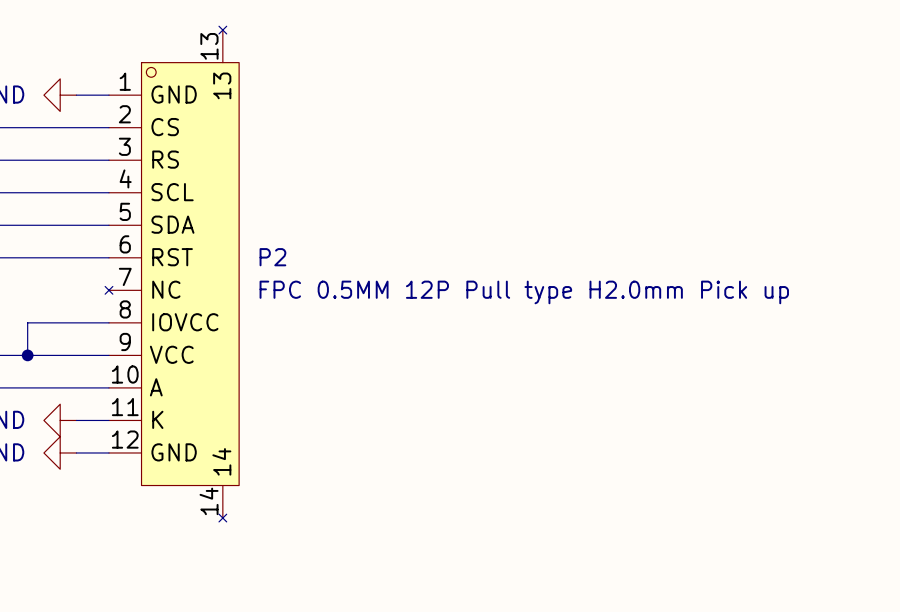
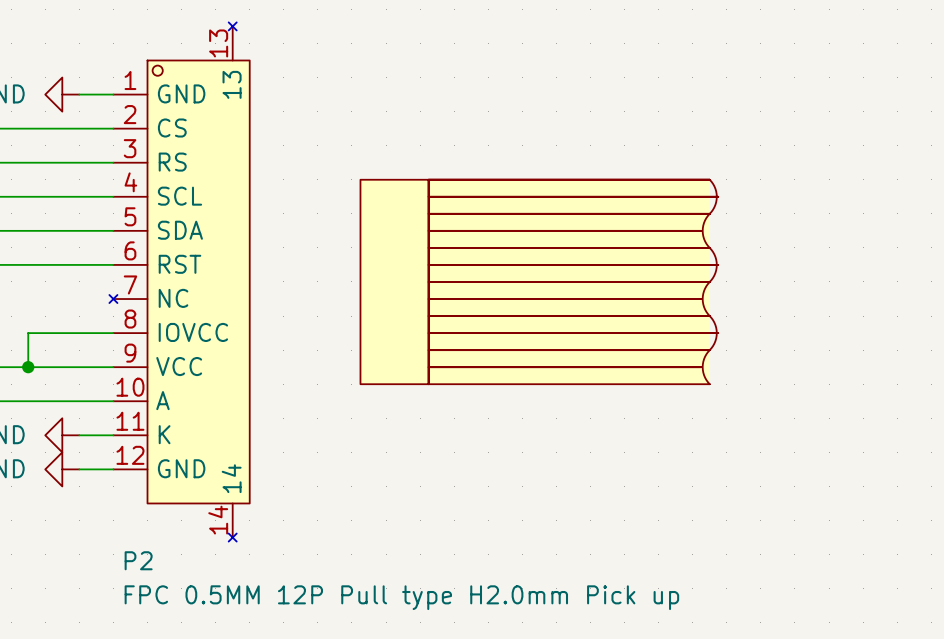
P2 name position: P2 (272, 257) -> P2 (138, 560)
part: none -> (539, 281)
P2 value position: FPC 0.5MM 12P Pull type H2.0mm Pick up (524, 292) -> FPC 0.5MM 12P Pull type H2.0mm Pick up (401, 597)

